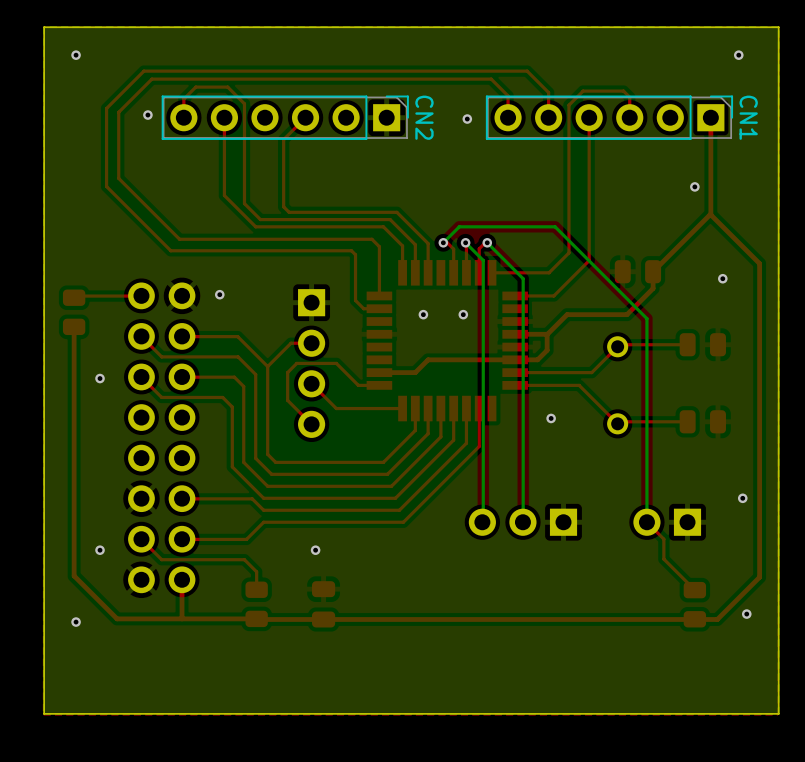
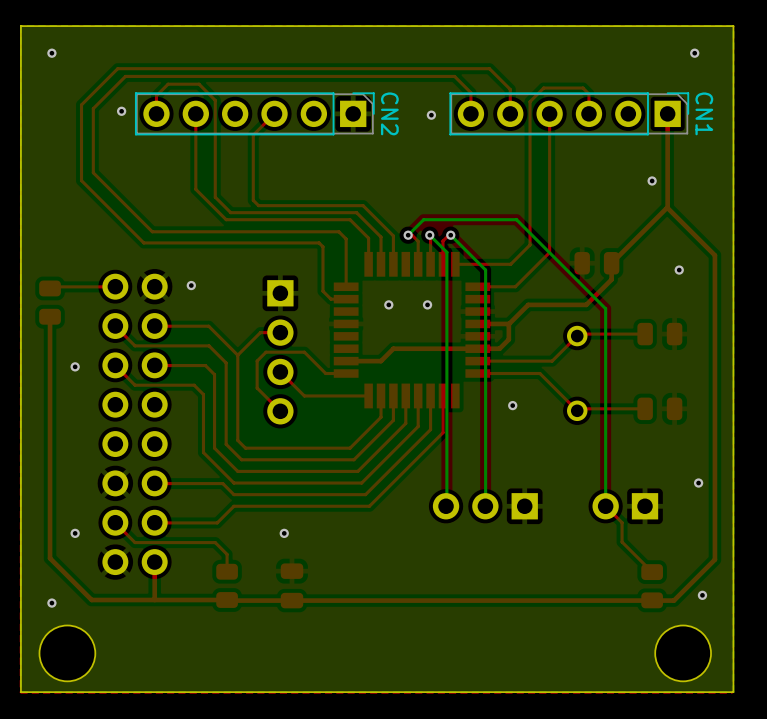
round board edge: none -> [39, 625, 96, 682]
round board edge: none -> [654, 625, 712, 682]

